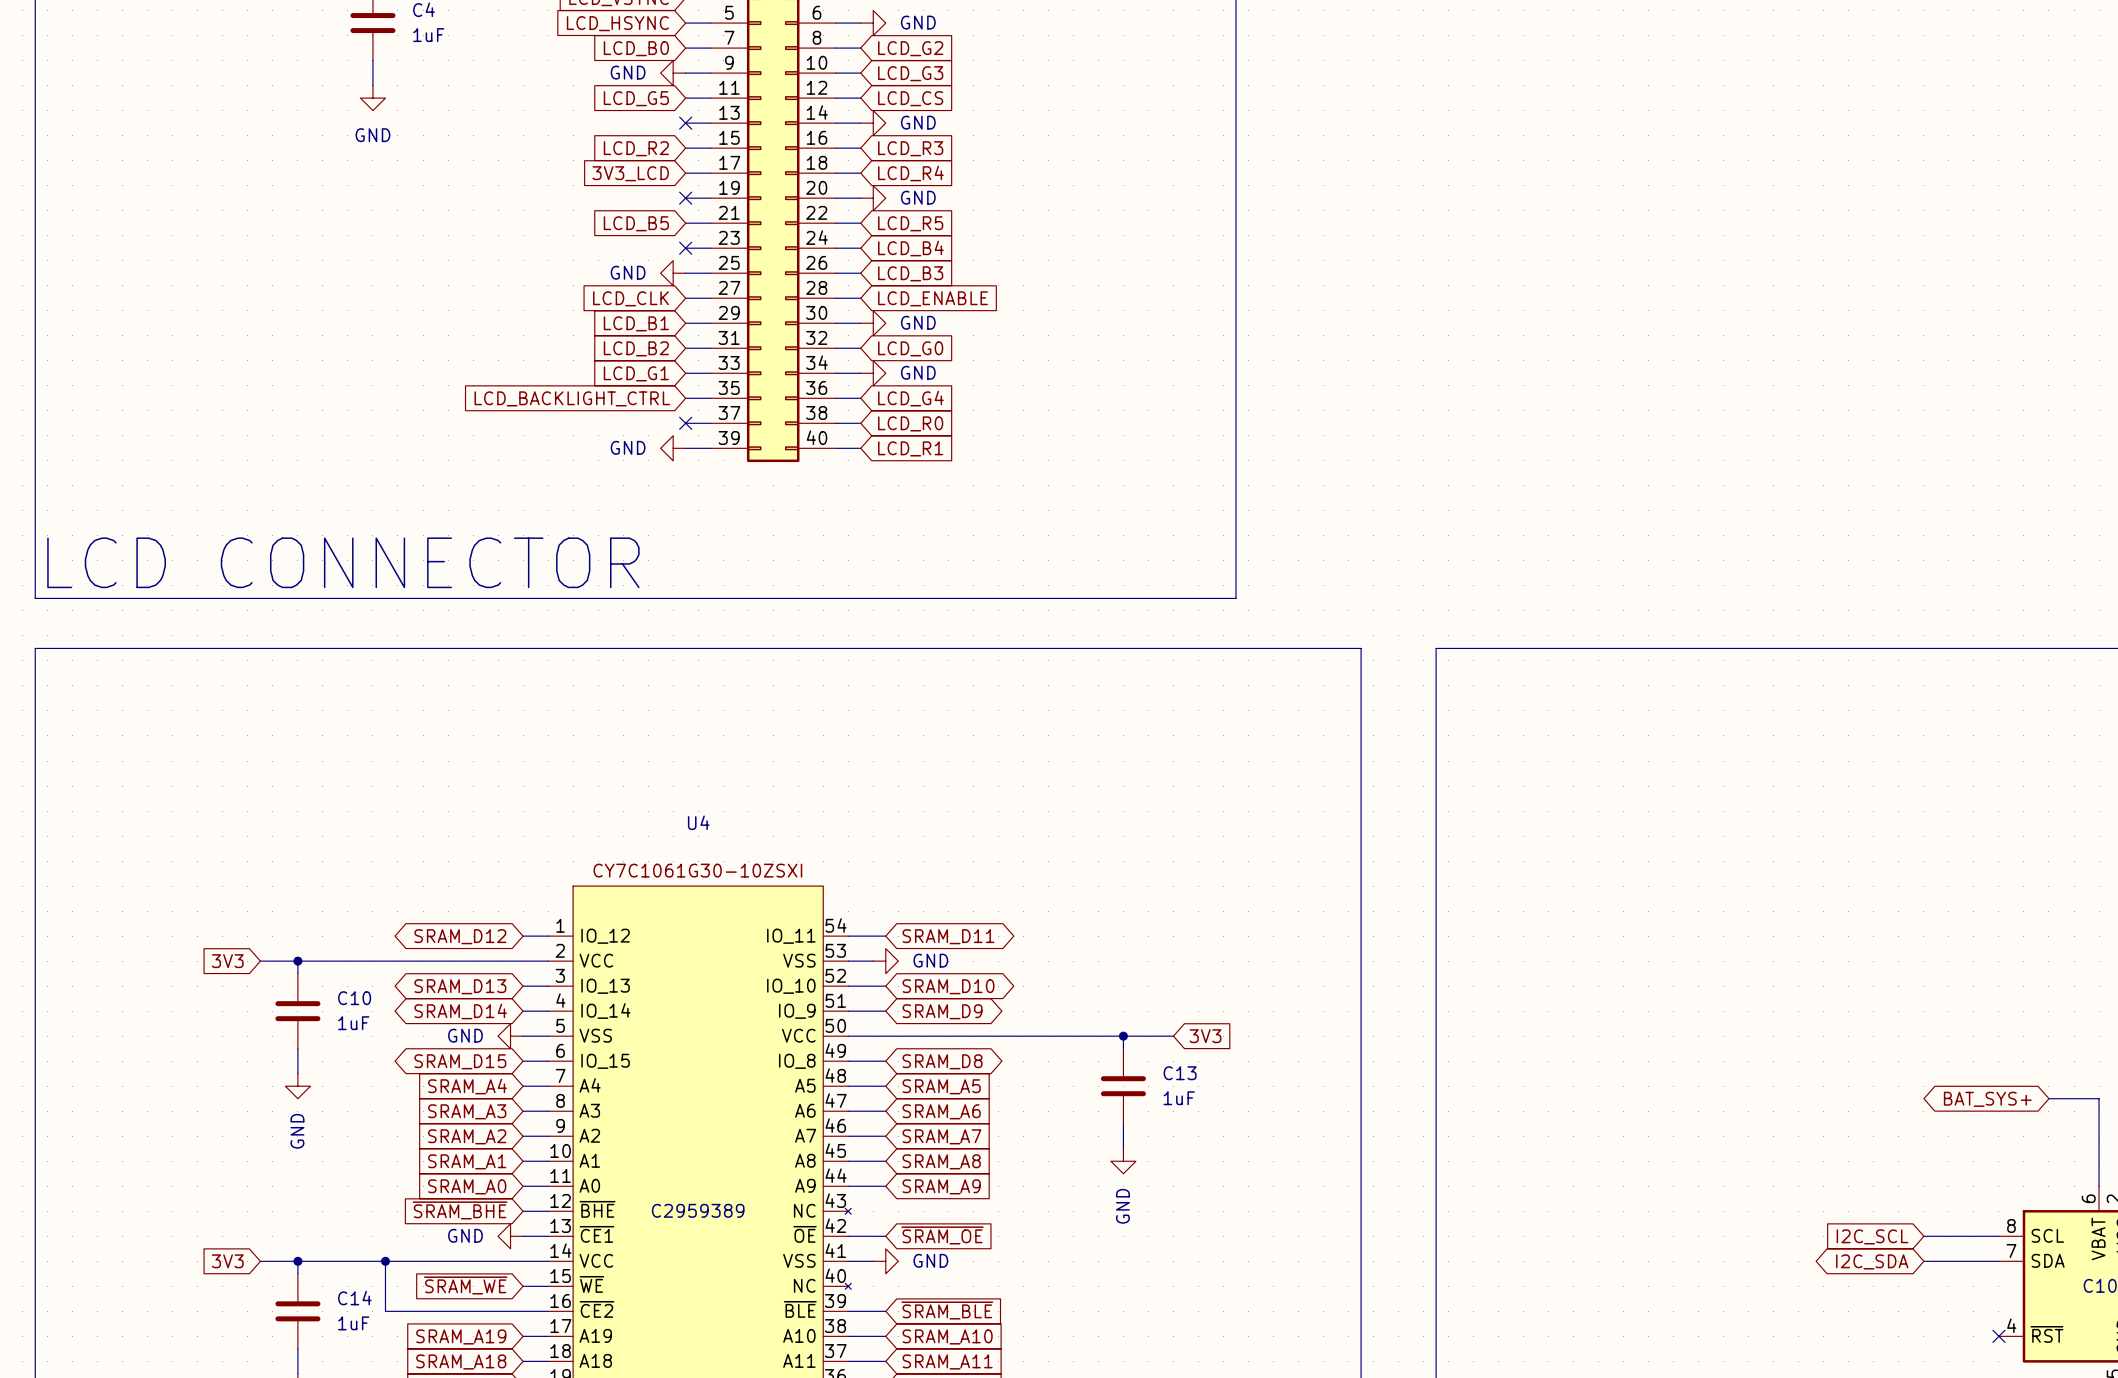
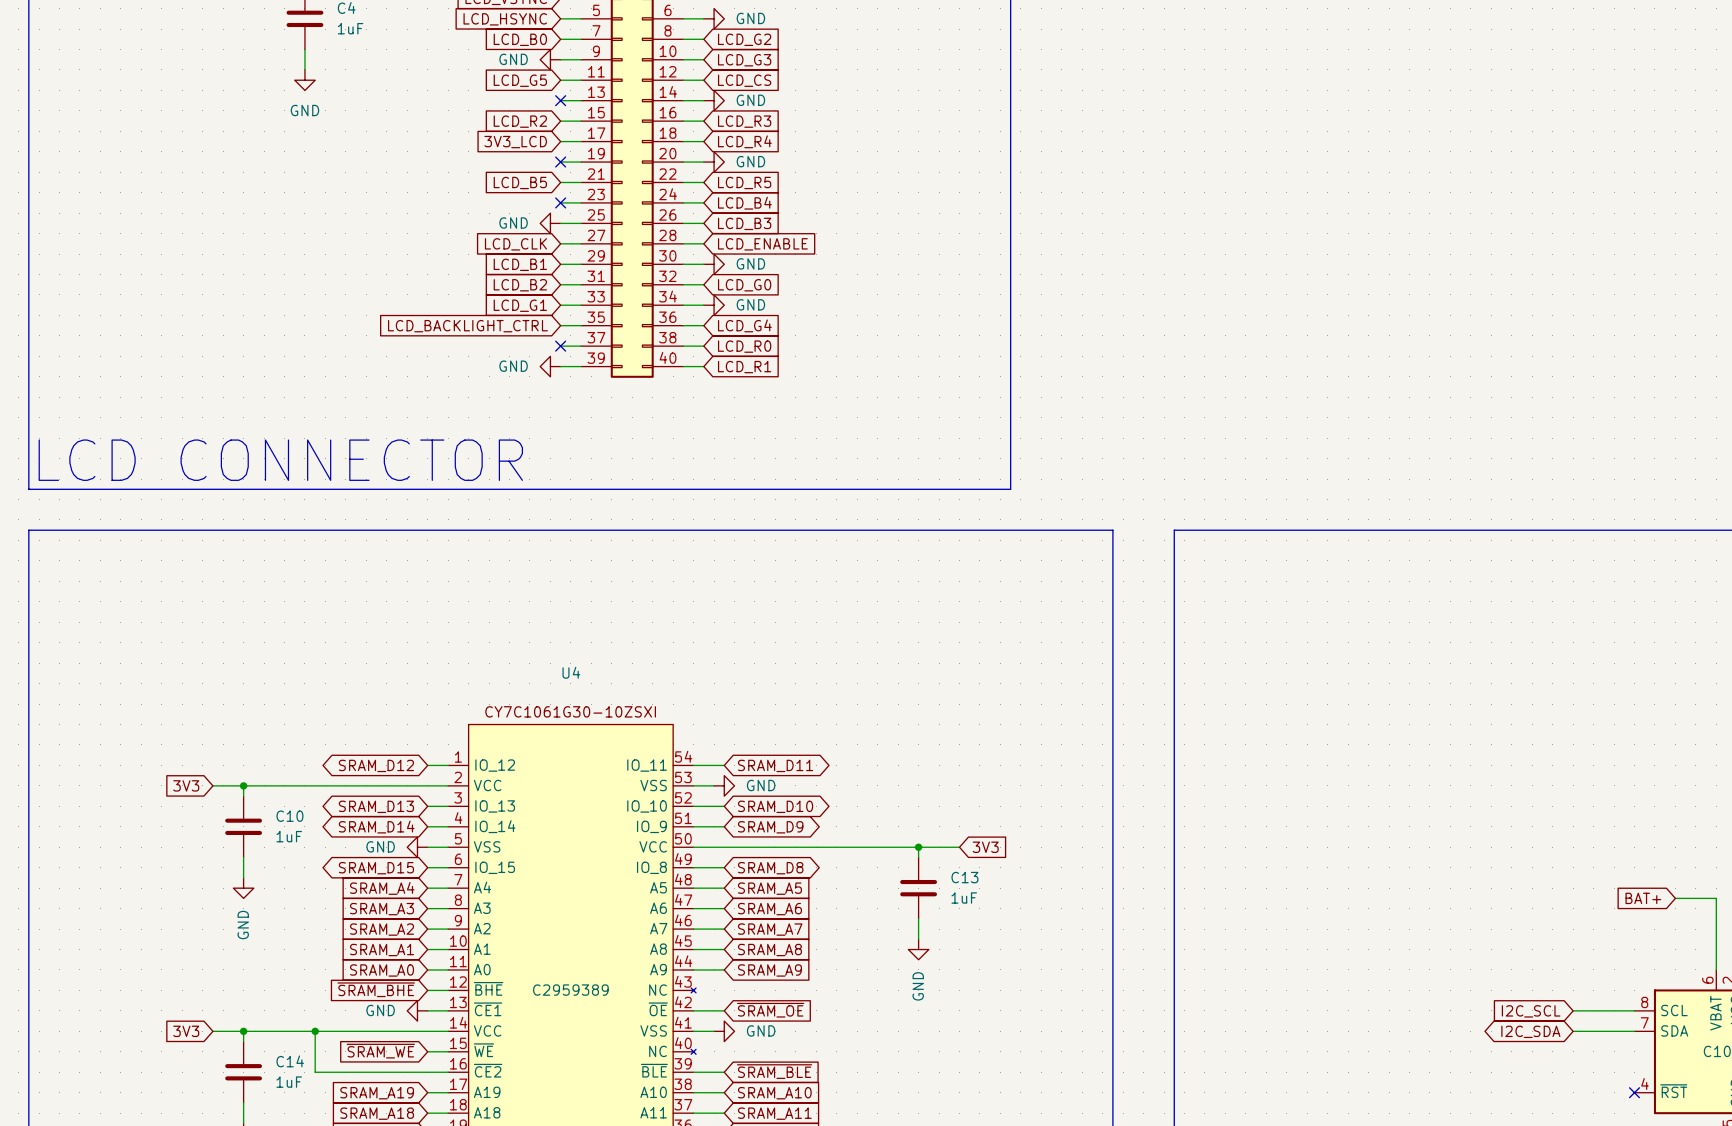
global label shape: bidirectional (1987, 1099) -> input (1643, 898)
global label: BAT_SYS+ (1987, 1099) -> BAT+ (1643, 898)

